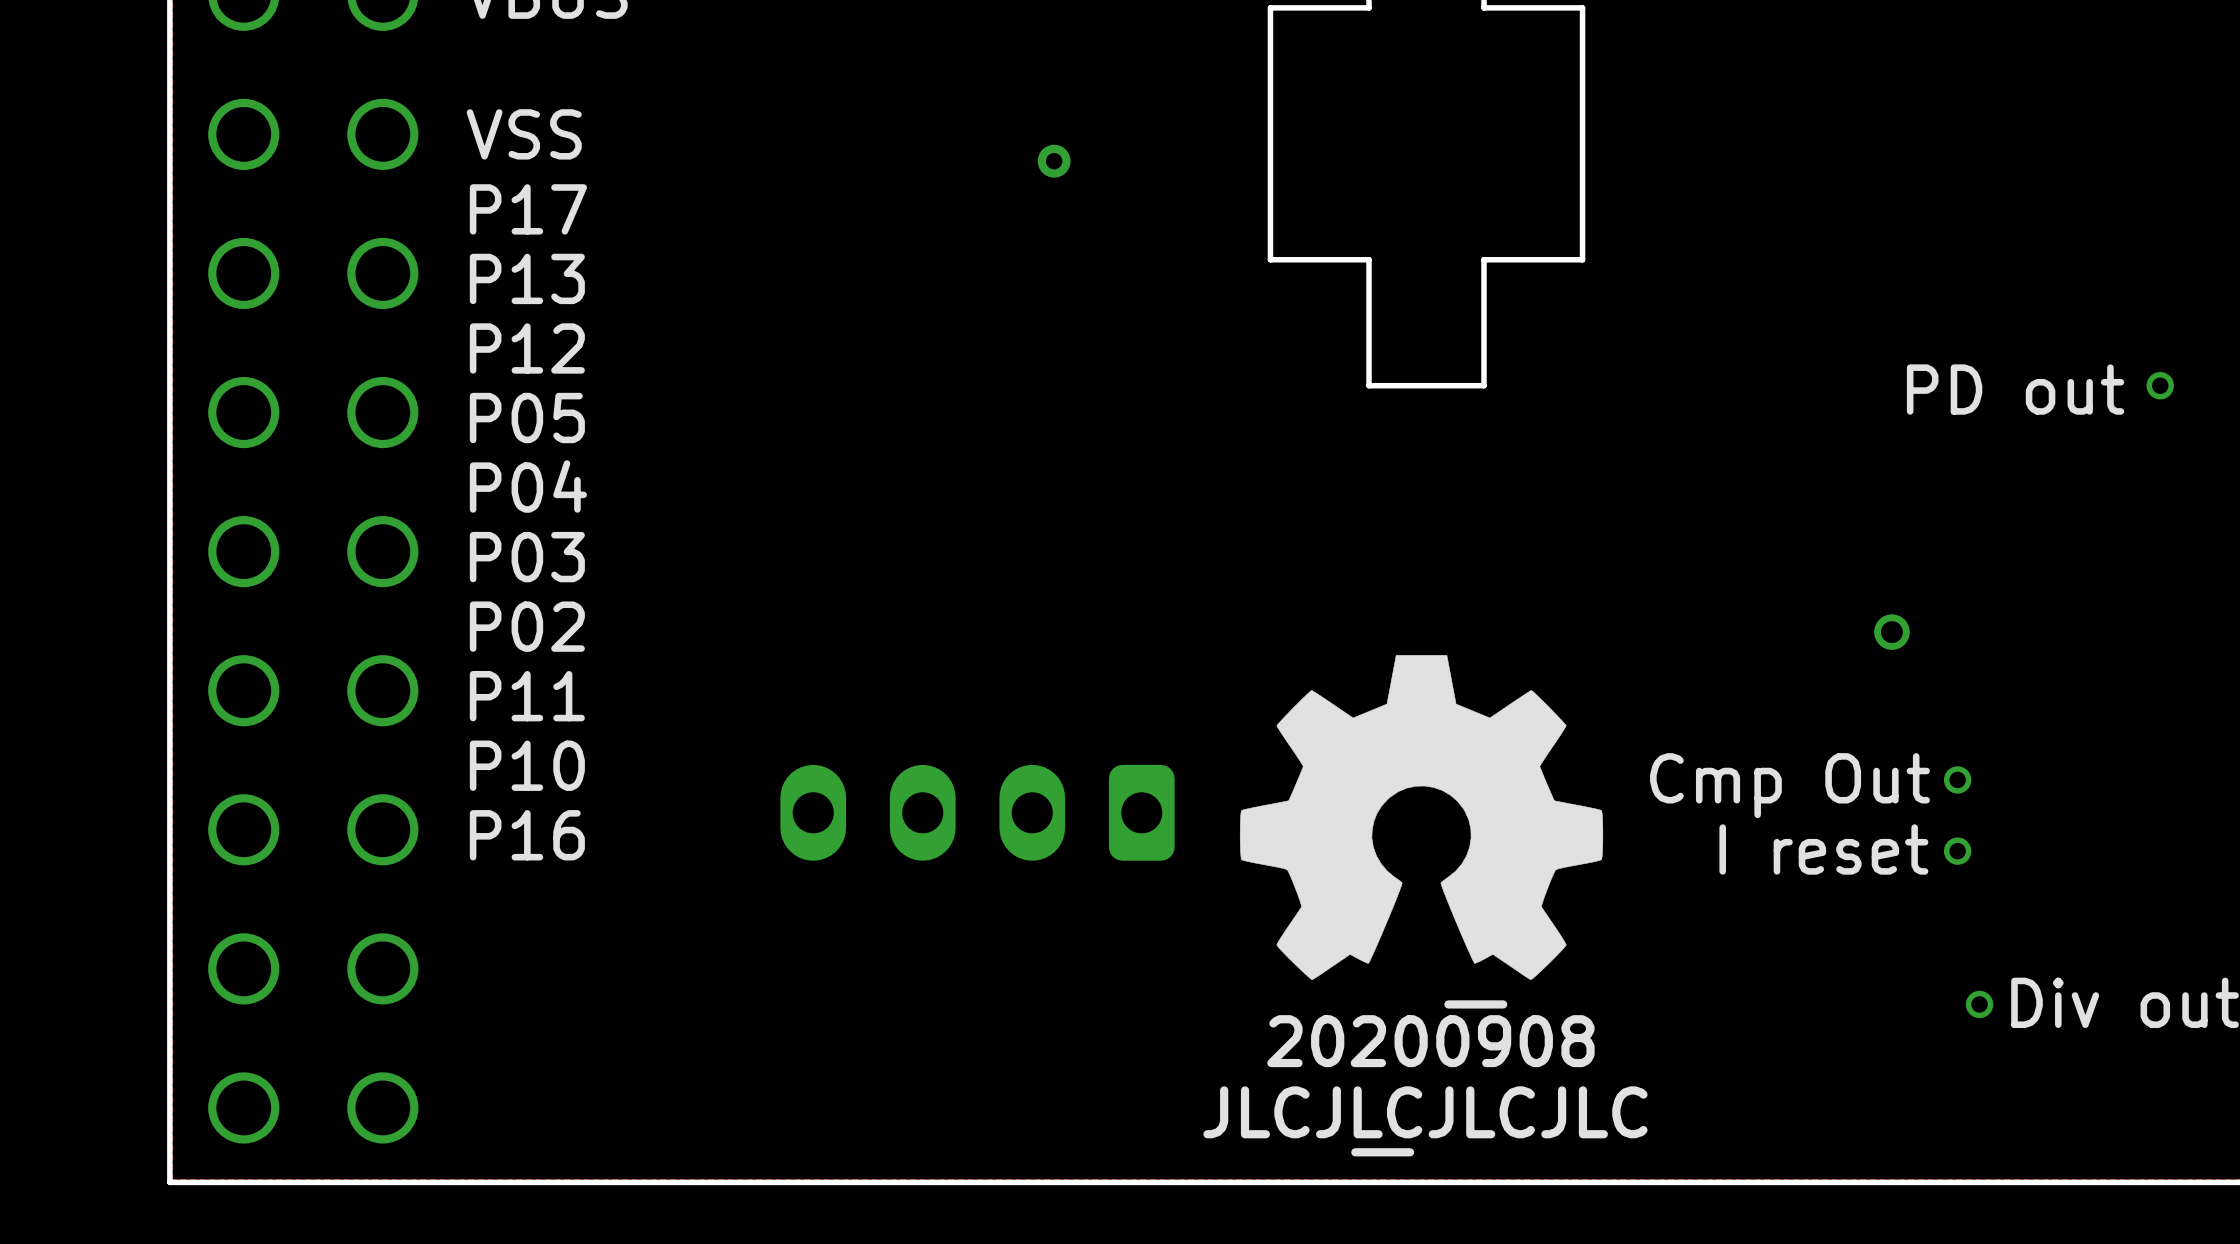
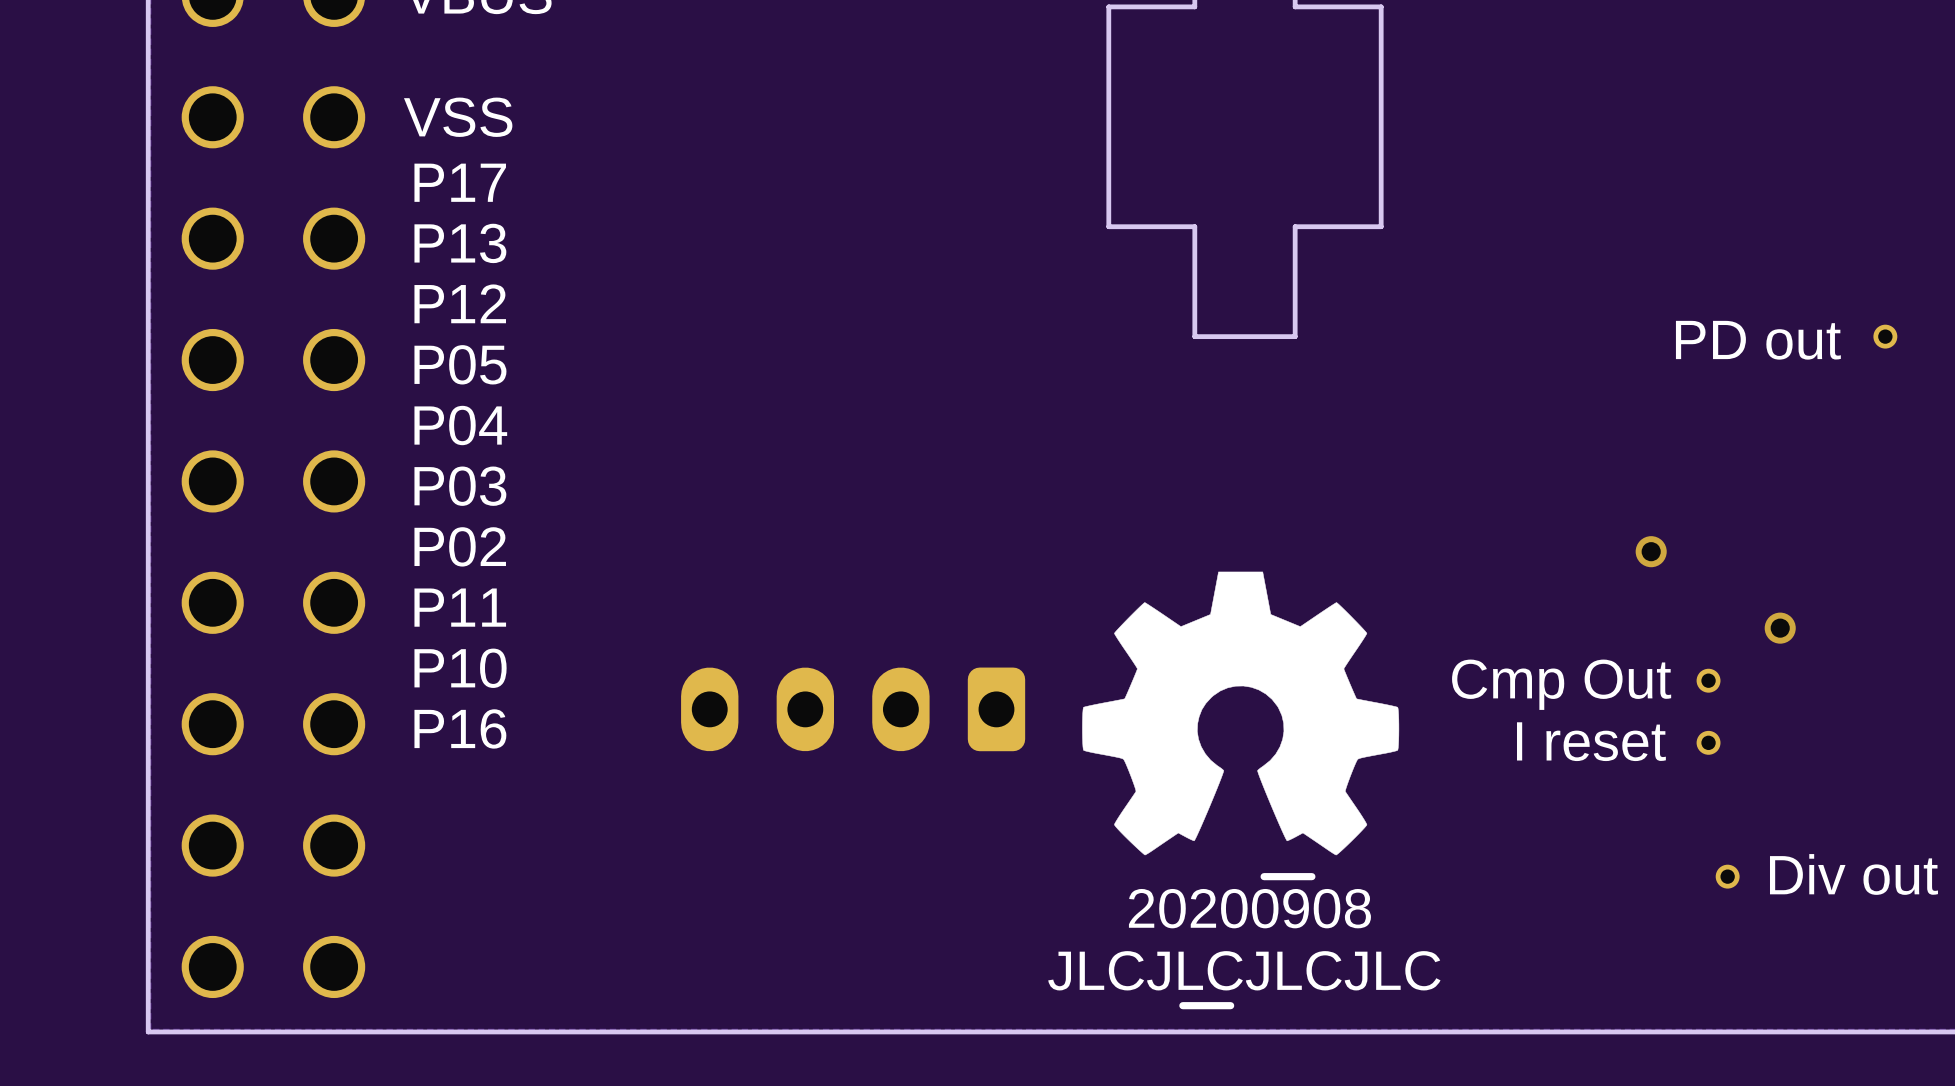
via: (1054, 161) -> none
via: none -> (1780, 628)

